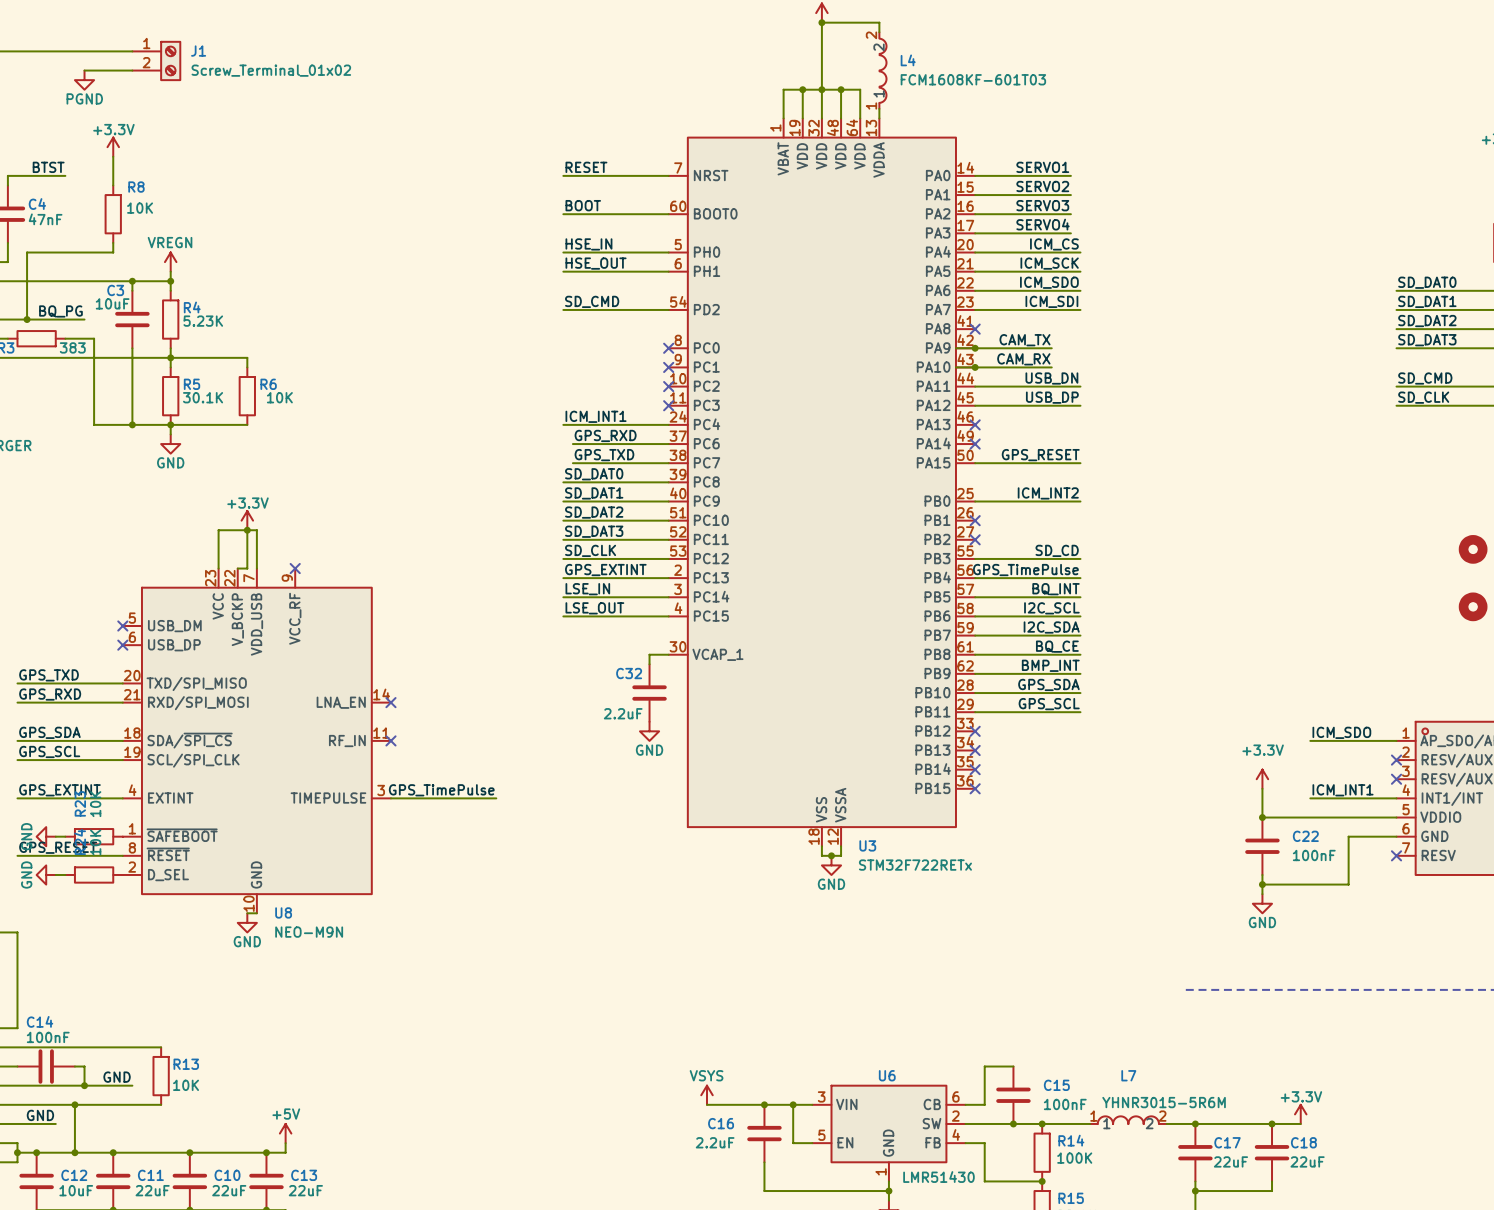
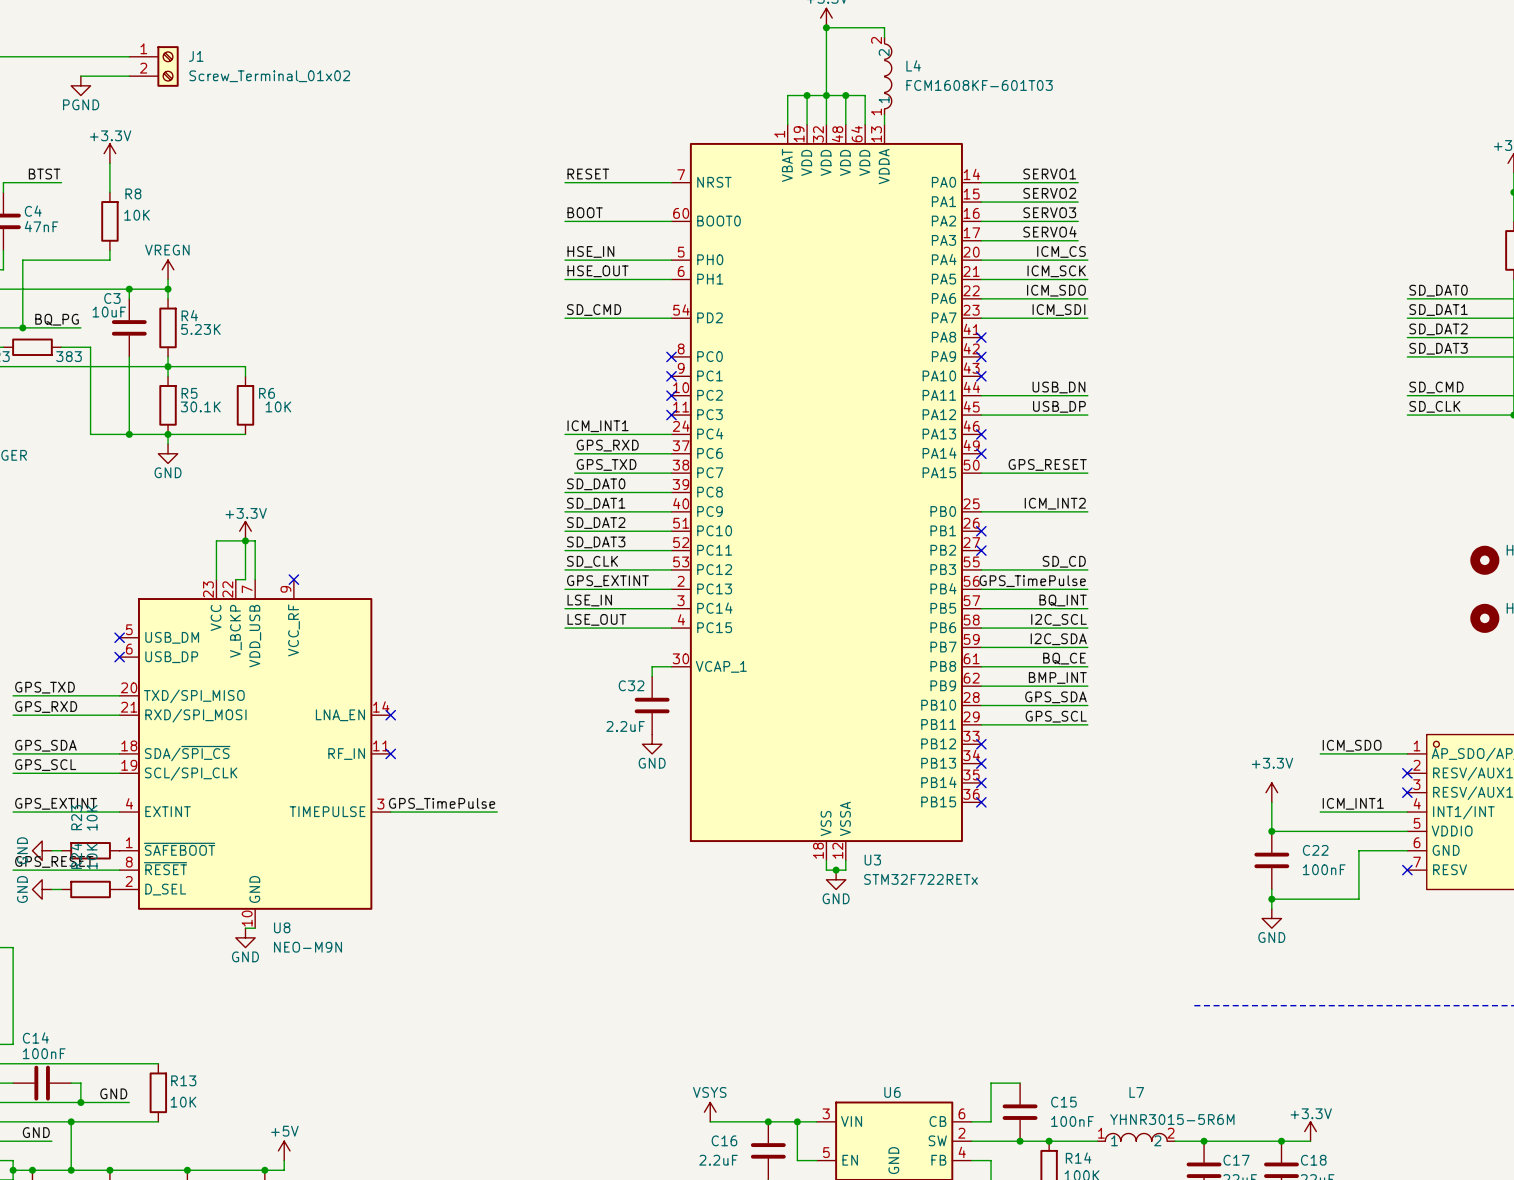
label: CAM_TX (1025, 340) -> none
wire: (955, 348) (1051, 348) -> none
junction: (975, 348) -> none
no-connect mark: none -> (981, 356)
label: CAM_RX (1023, 359) -> none
wire: (955, 367) (1051, 367) -> none
junction: (975, 367) -> none
no-connect mark: none -> (981, 376)

